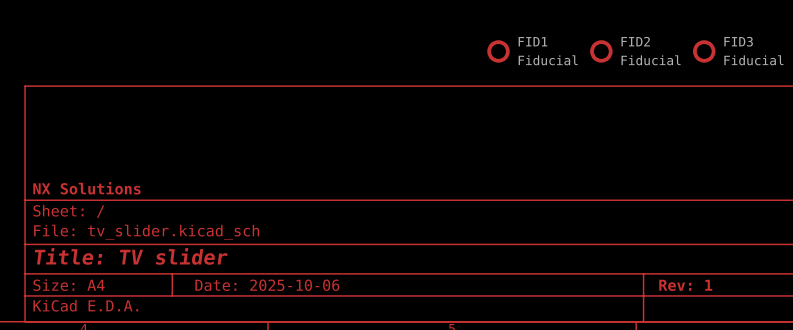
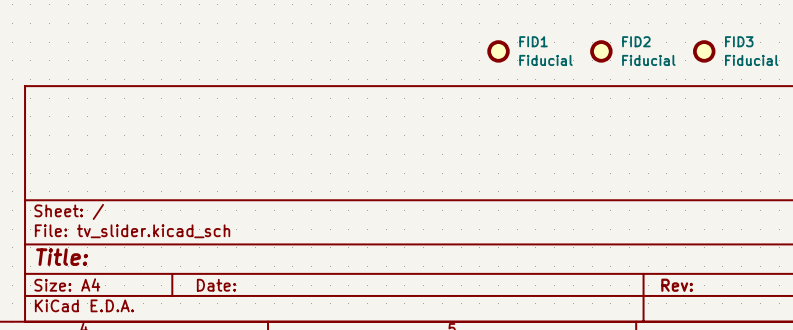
title block: NX Solutions (86, 188) -> none
title block: Title: TV slider (131, 256) -> Title: (62, 257)
title block: Date: 2025-10-06 (267, 285) -> Date: (216, 285)
title block: Rev: 1 (685, 285) -> Rev: (677, 285)

